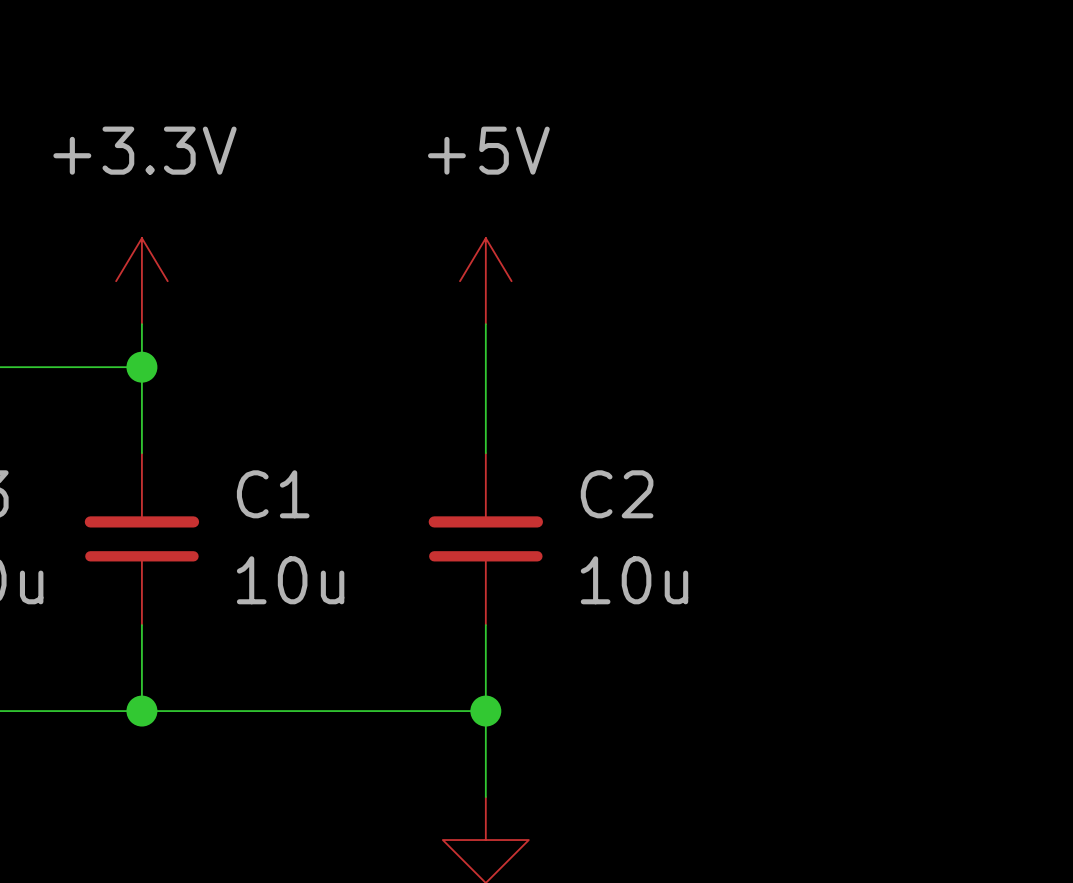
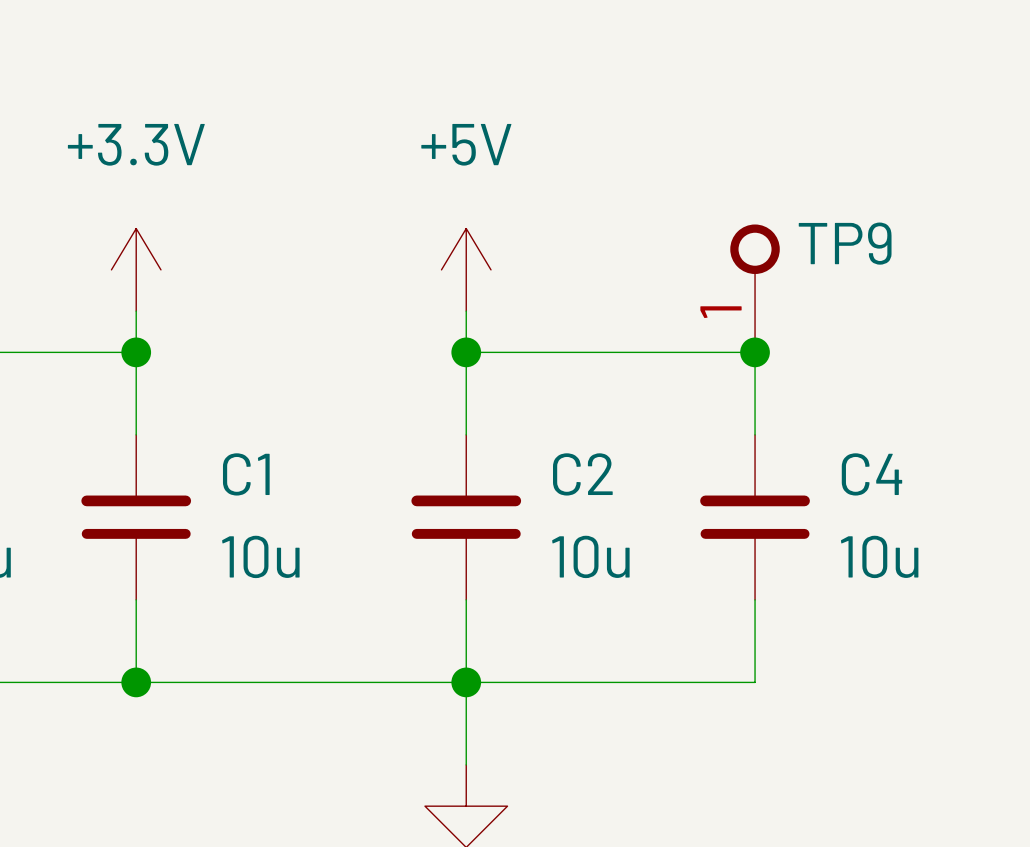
TP9: none -> (755, 288)
wire: none -> (466, 352) (755, 352) (755, 434)
junction: none -> (466, 352)
junction: none -> (755, 352)
C4: none -> (755, 517)
wire: none -> (755, 599) (755, 682) (466, 682)

